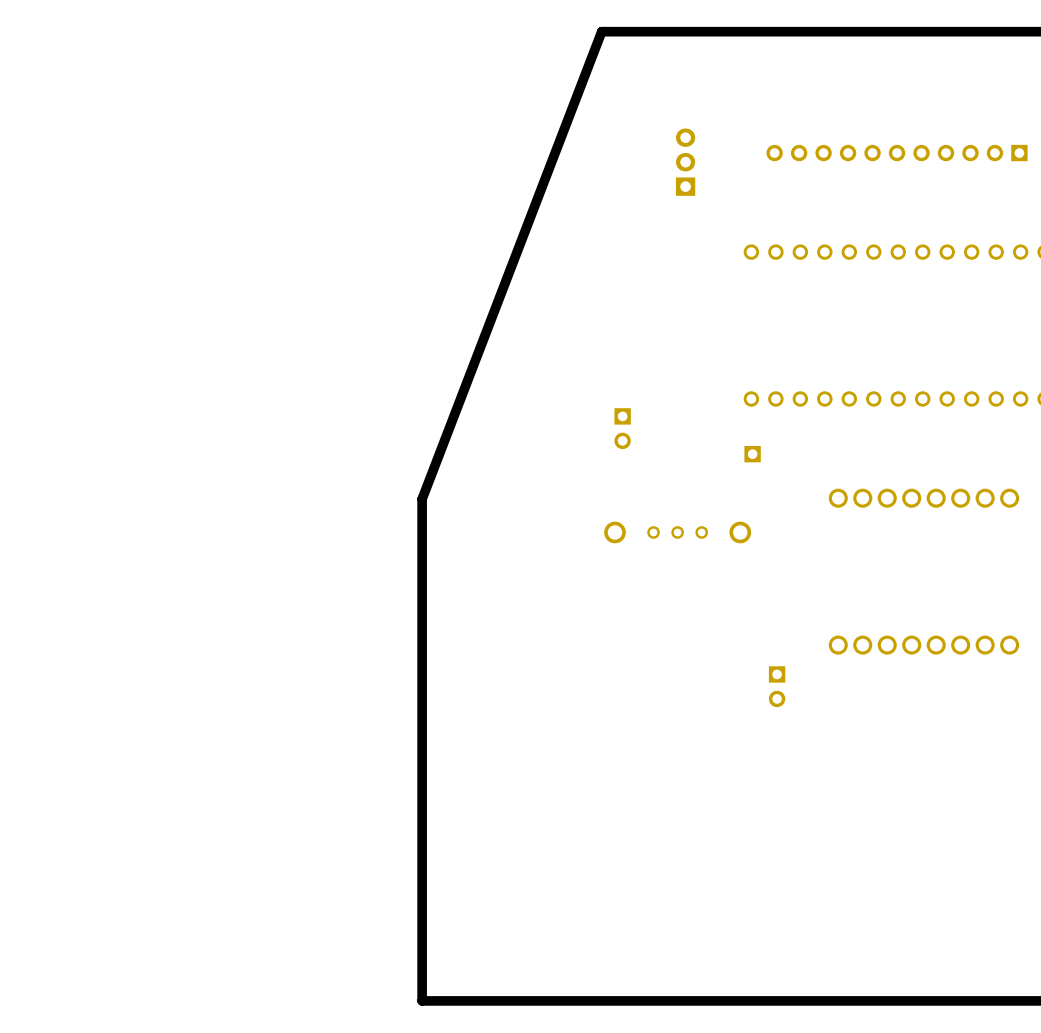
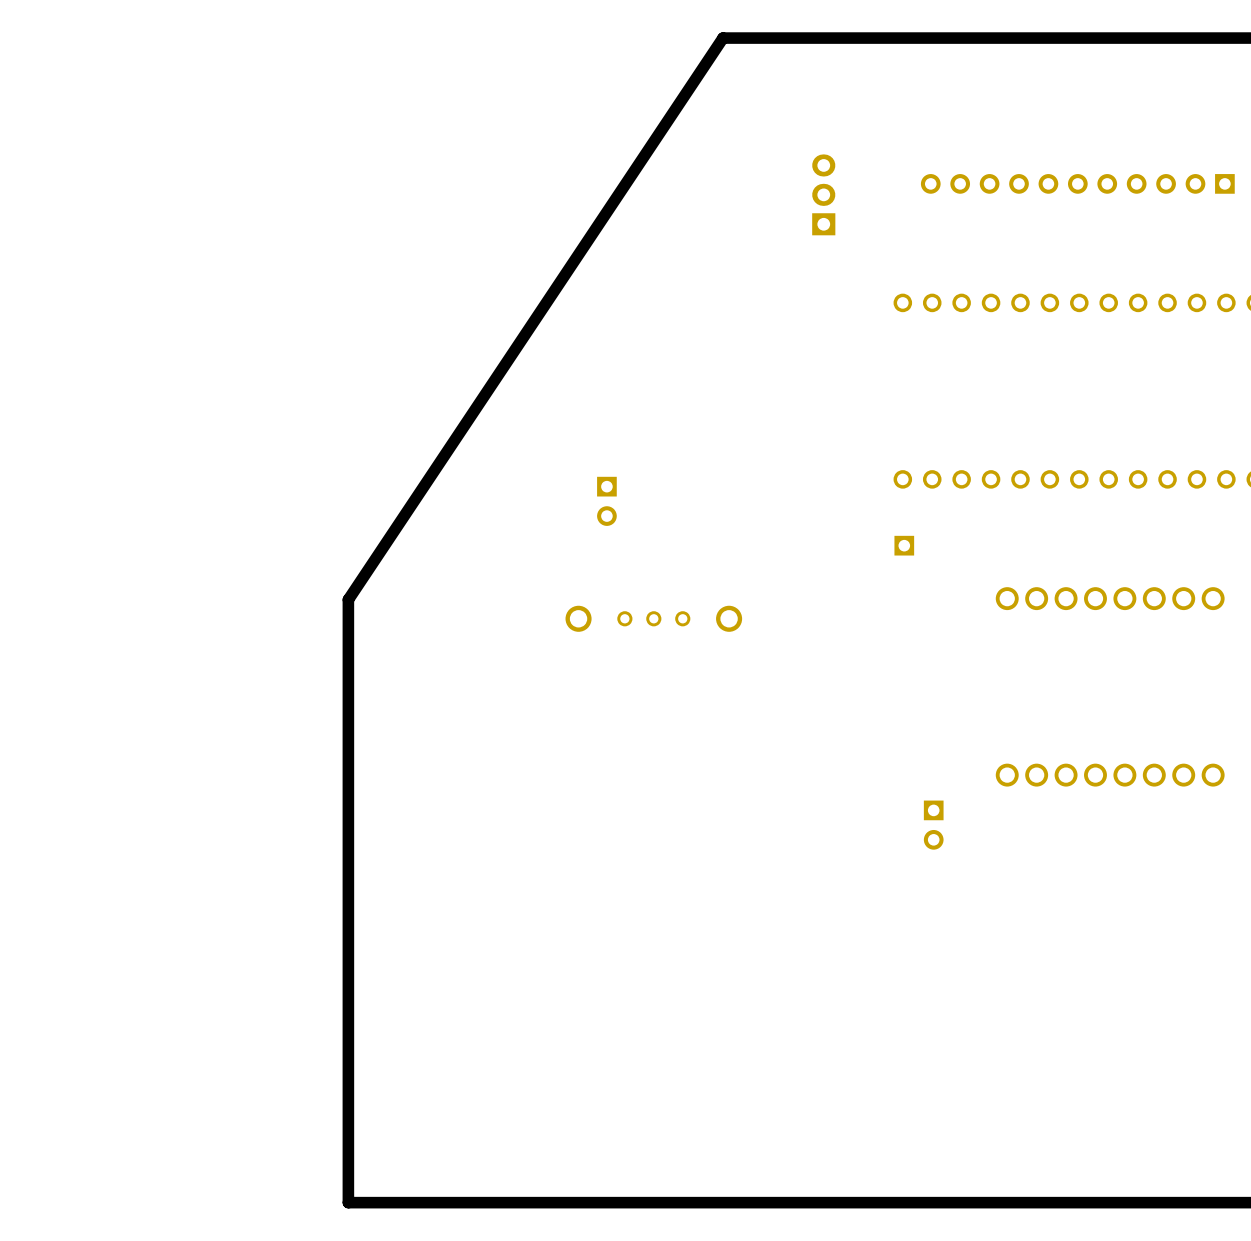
board edge: (601, 31) (422, 499) (422, 1000) -> (723, 38) (348, 599) (348, 1202) (507, 1202)
part position: (622, 428) -> (606, 501)
part position: (677, 532) -> (653, 618)

